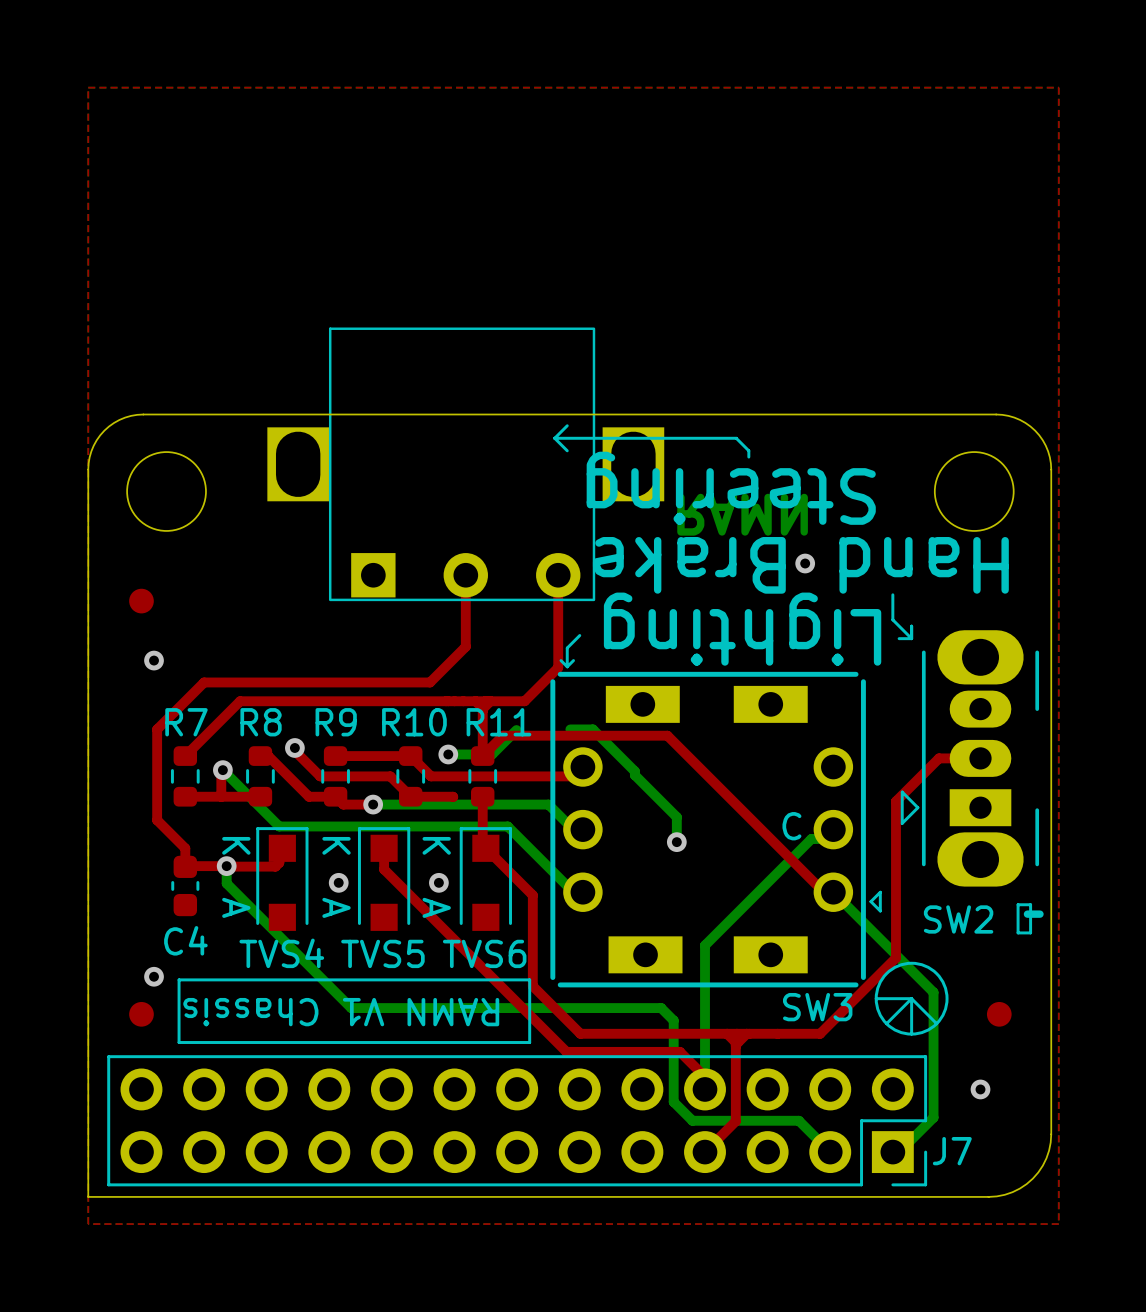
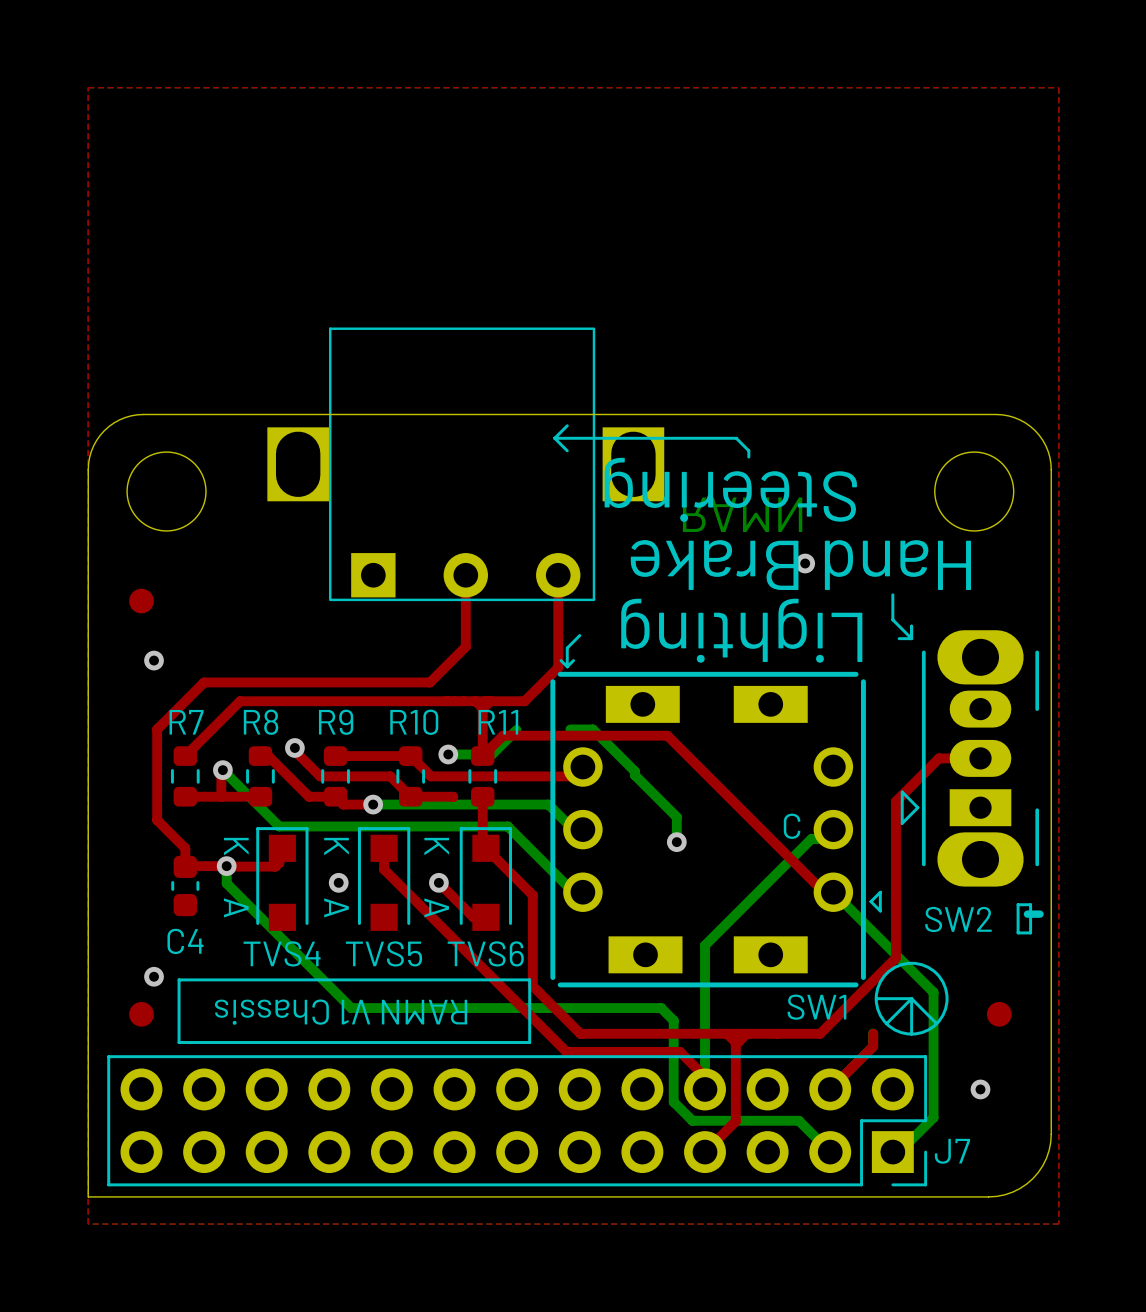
top track: none -> (438, 882) (473, 917) (485, 917)
SW3 name: SW3 (817, 1007) -> SW1 (816, 1007)
top track: none -> (873, 1033) (873, 1046) (830, 1089)

